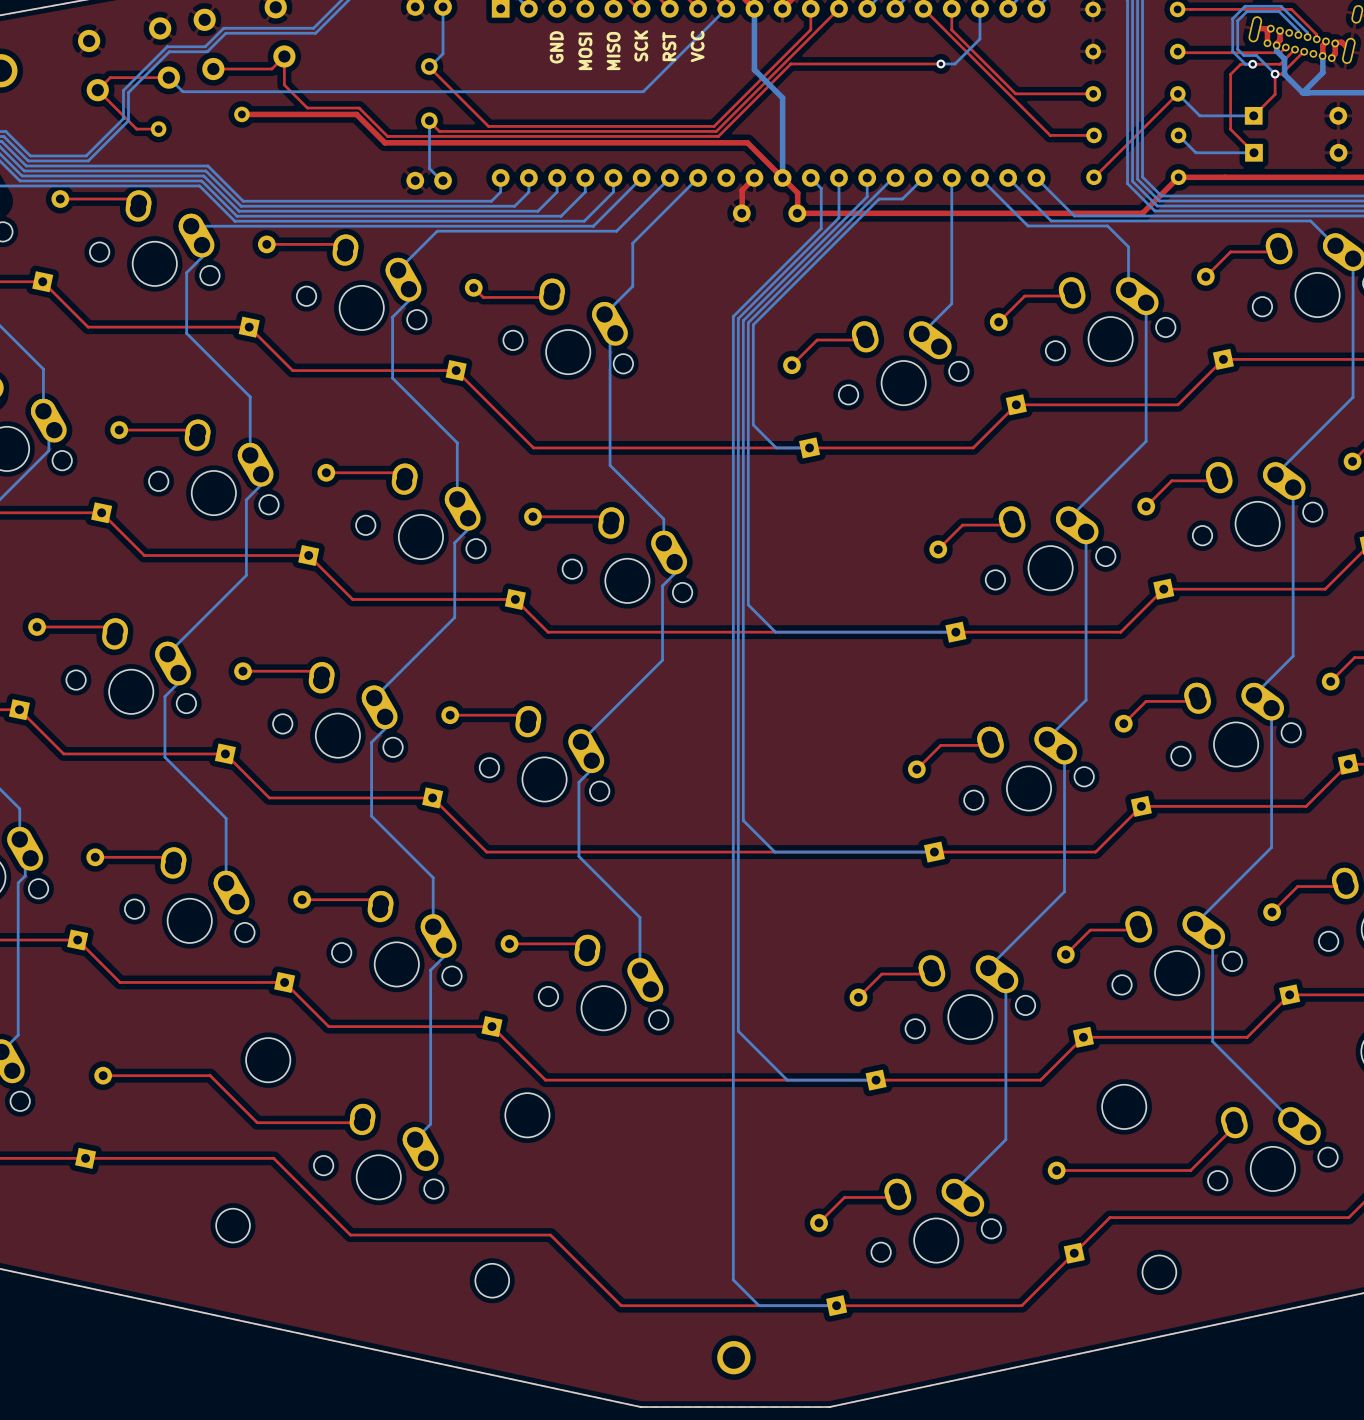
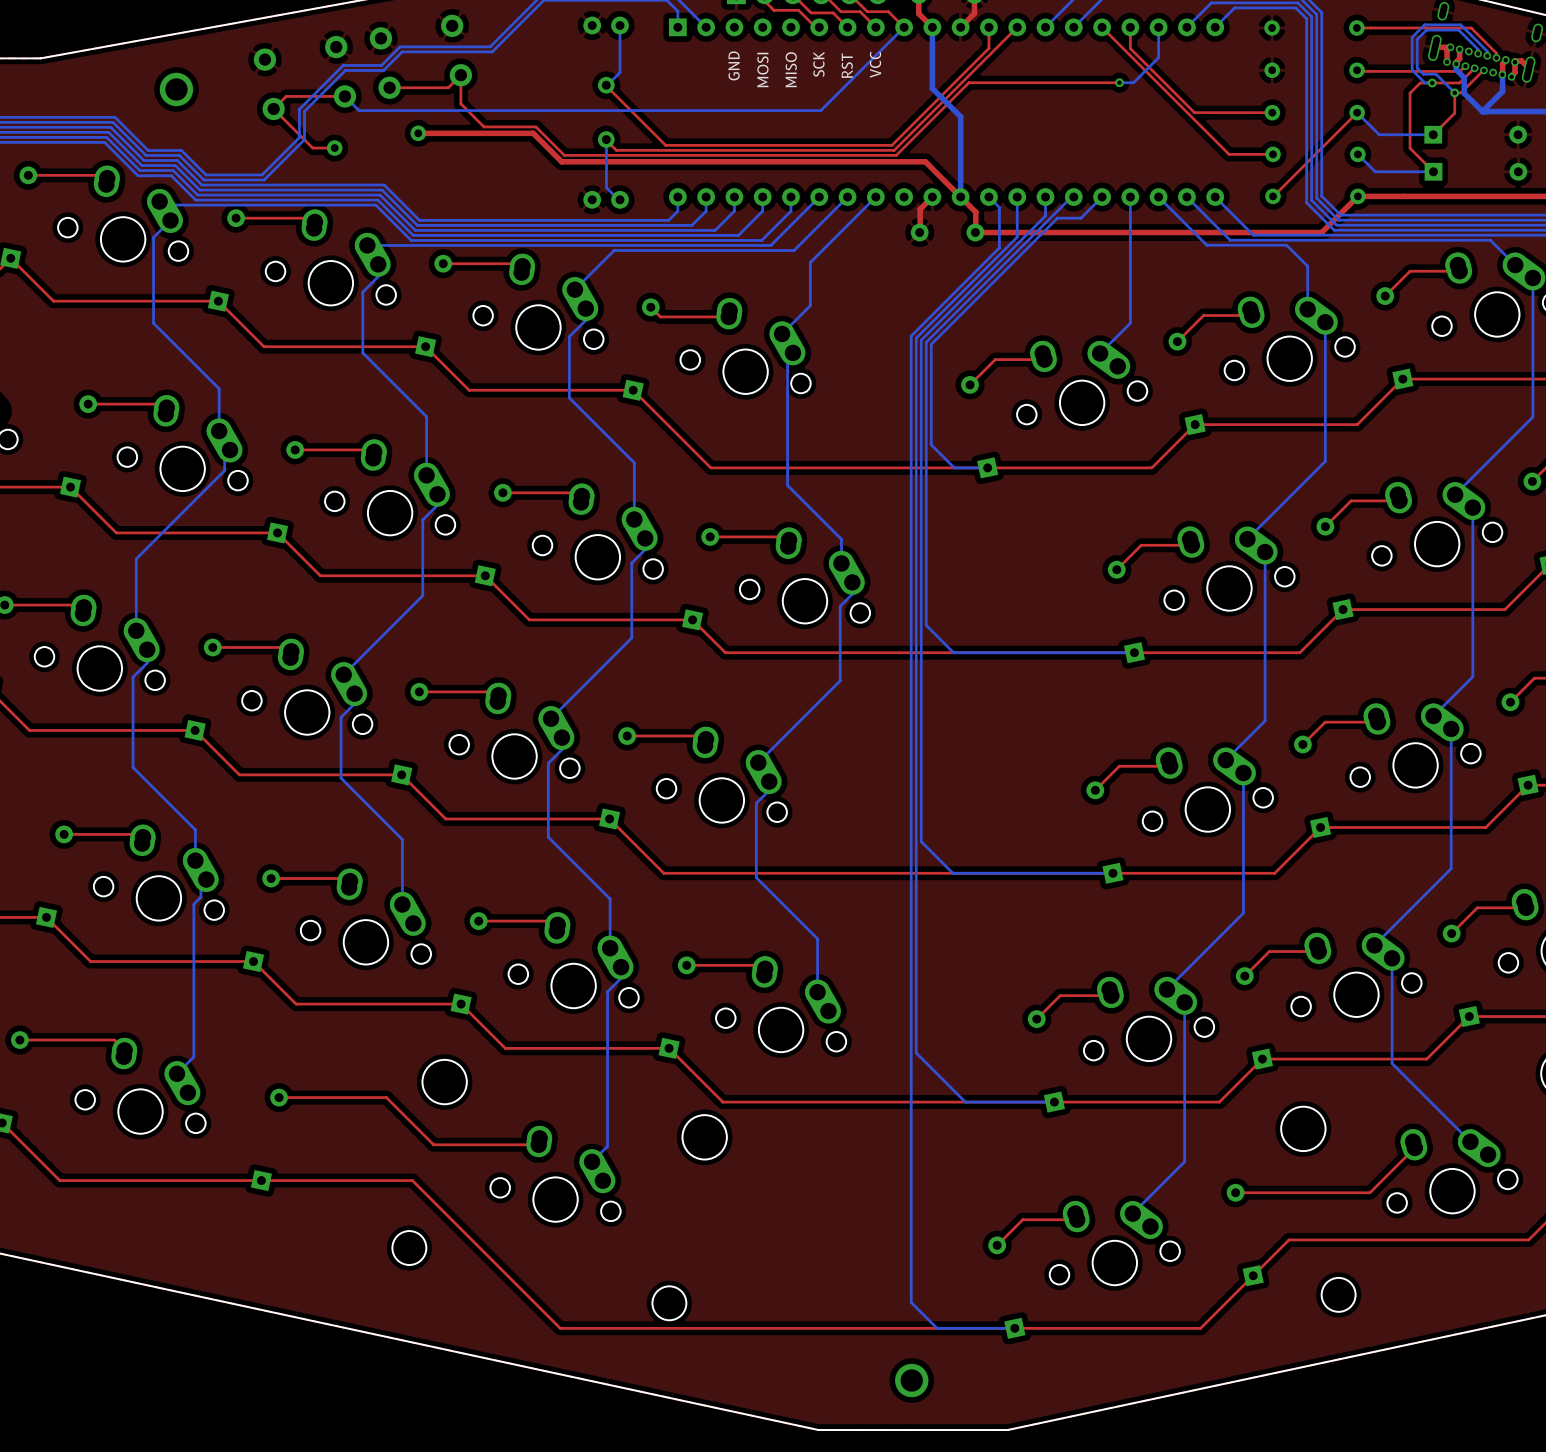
top track: (236, 1158) (273, 1158) (350, 1235) (550, 1235) (621, 1305) -> (412, 1180) (560, 1328) (798, 1328)

